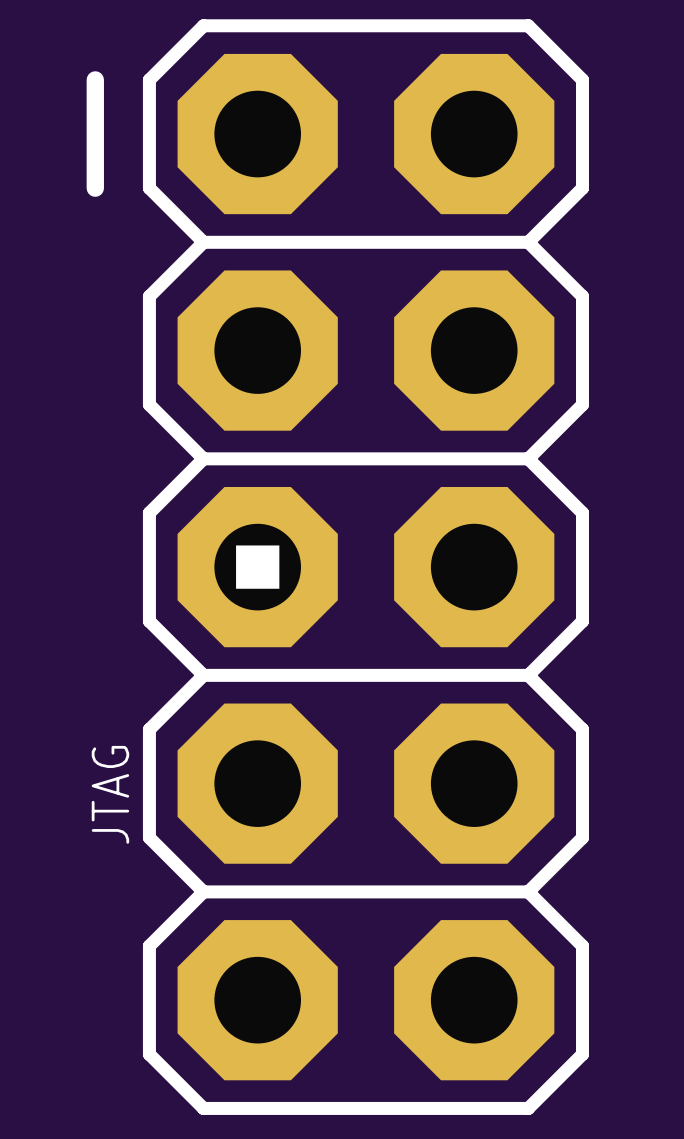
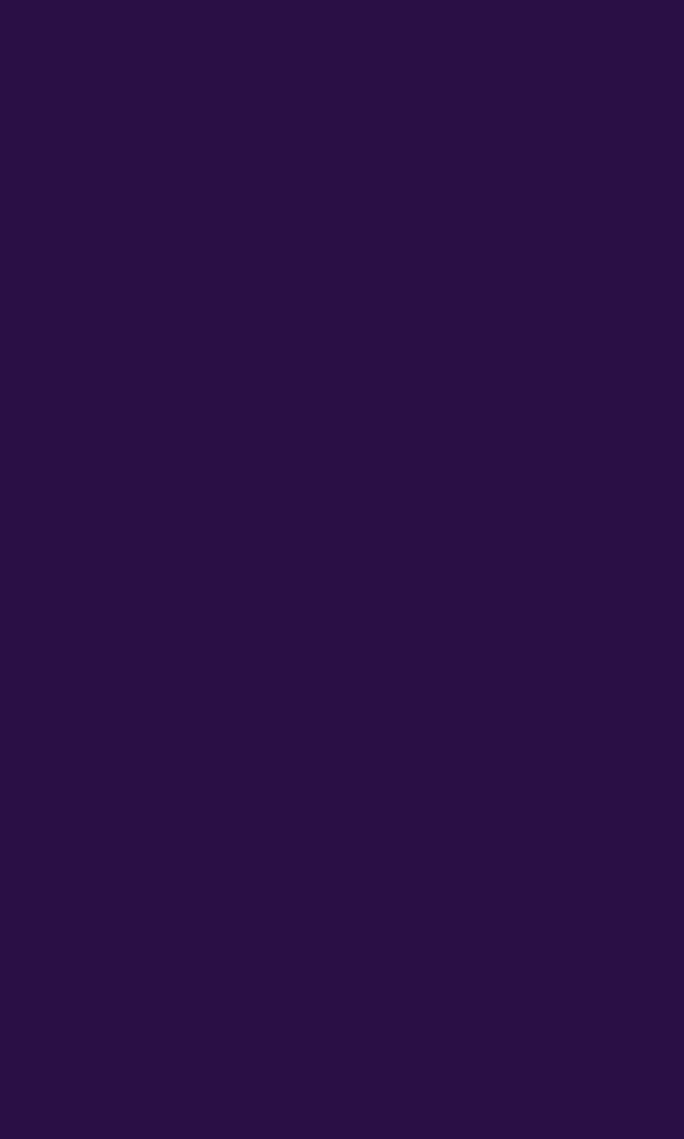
JTAG: (337, 567) -> none

